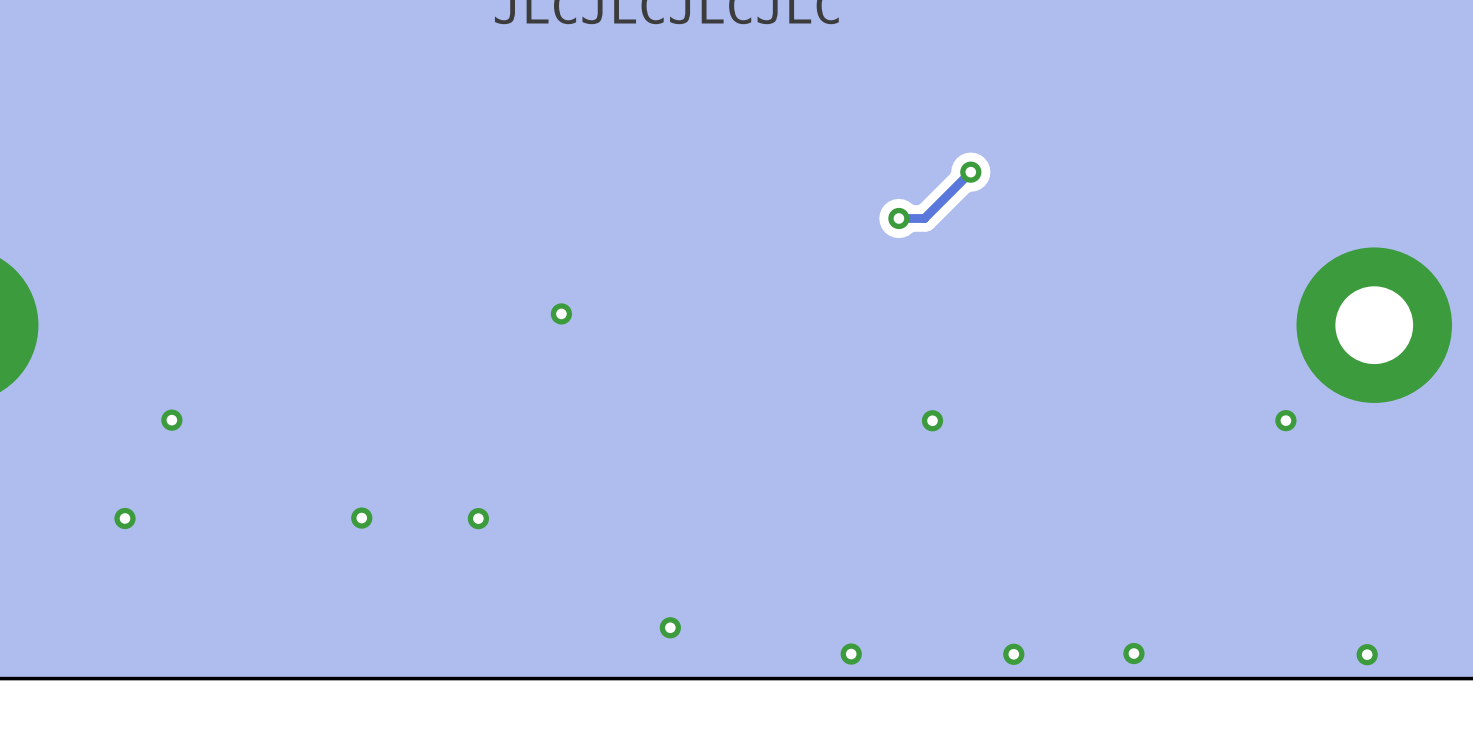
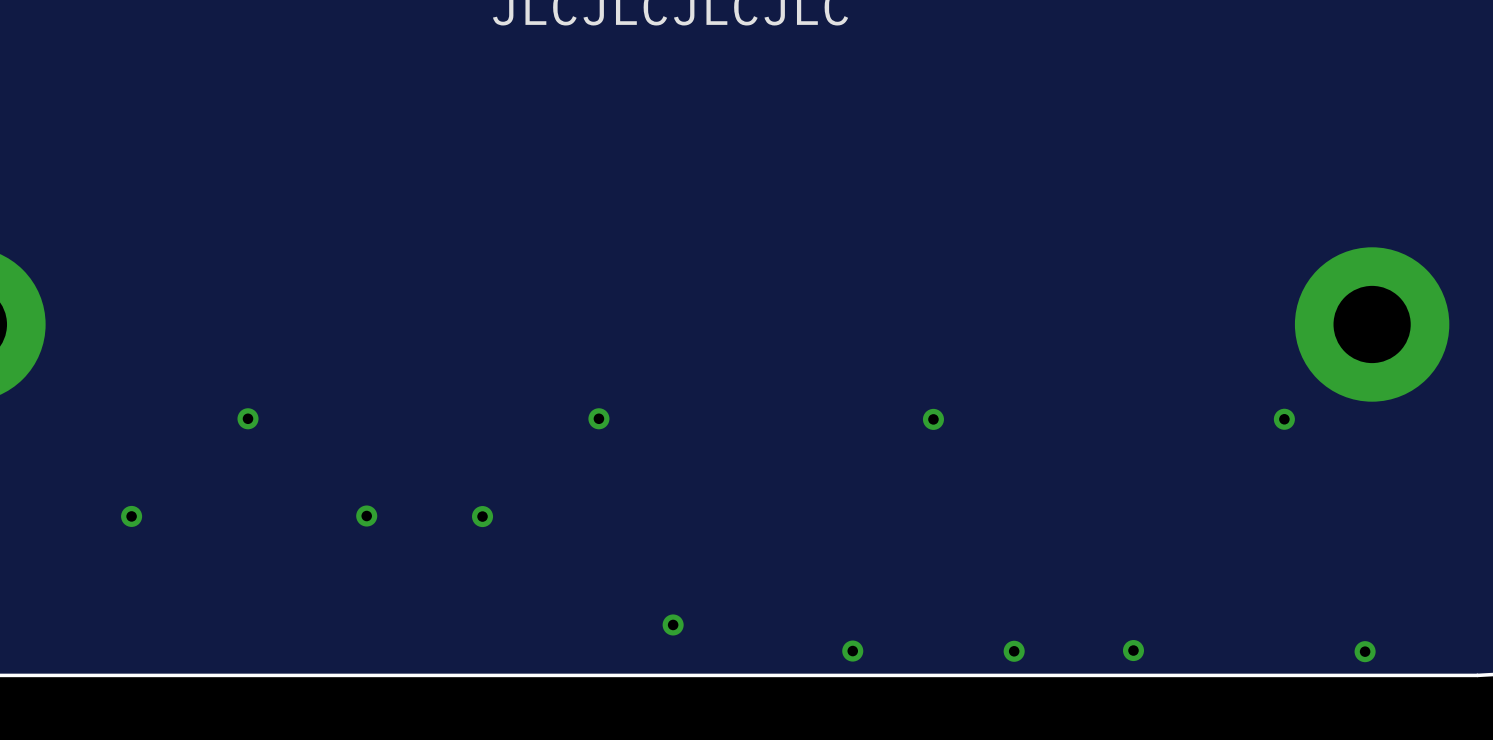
track: (970, 172) (924, 218) (898, 218) -> none
via: (970, 172) -> none
via: (898, 218) -> none
via position: (561, 313) -> (598, 418)
via position: (171, 420) -> (248, 418)

